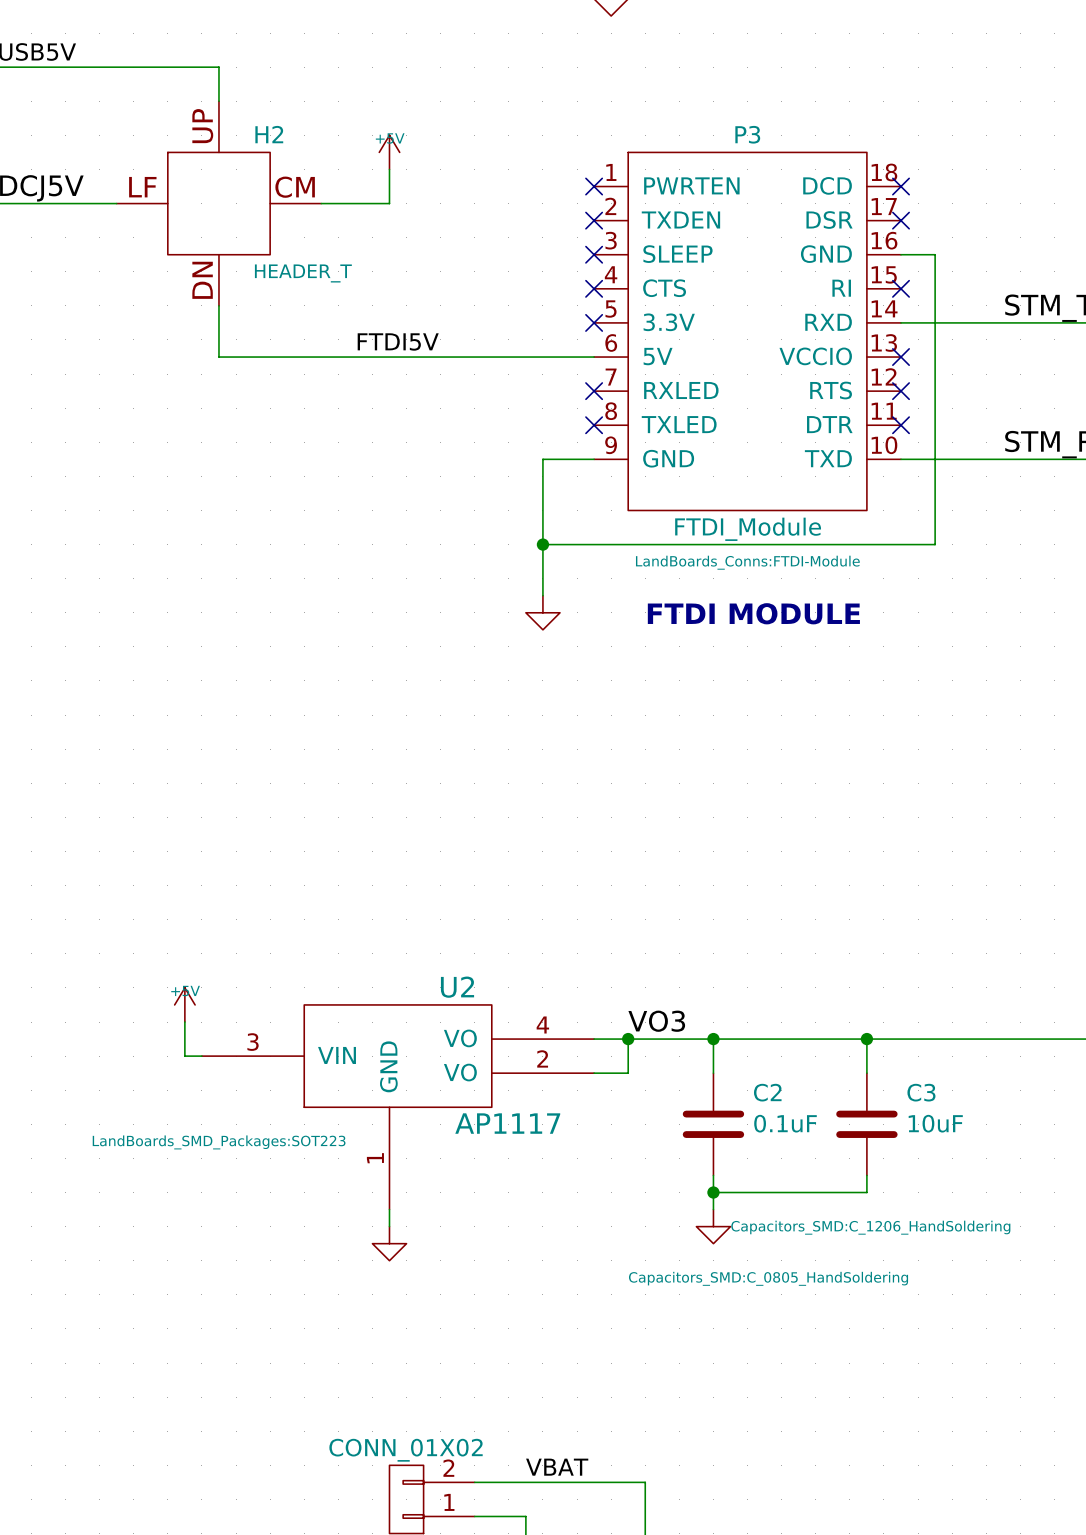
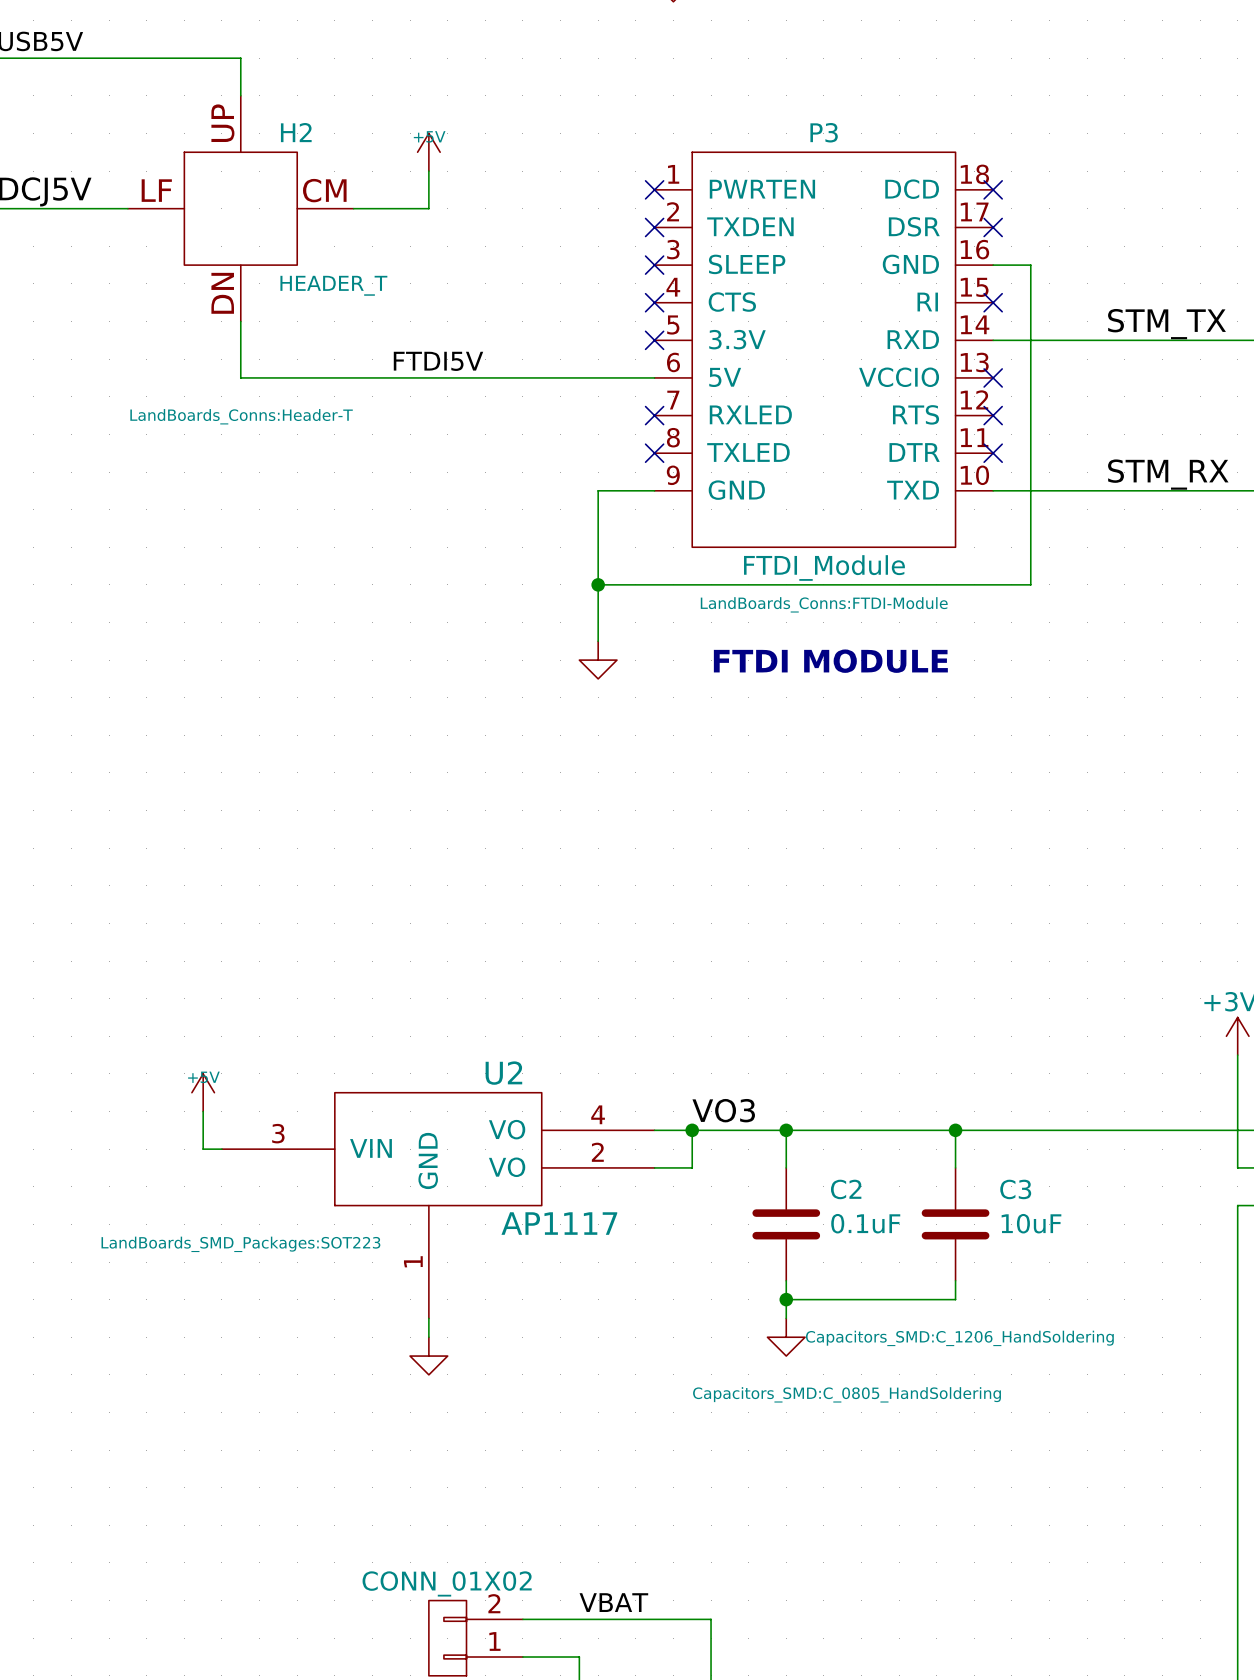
H2 text: none -> LandBoards_Conns:Header-T (241, 416)

